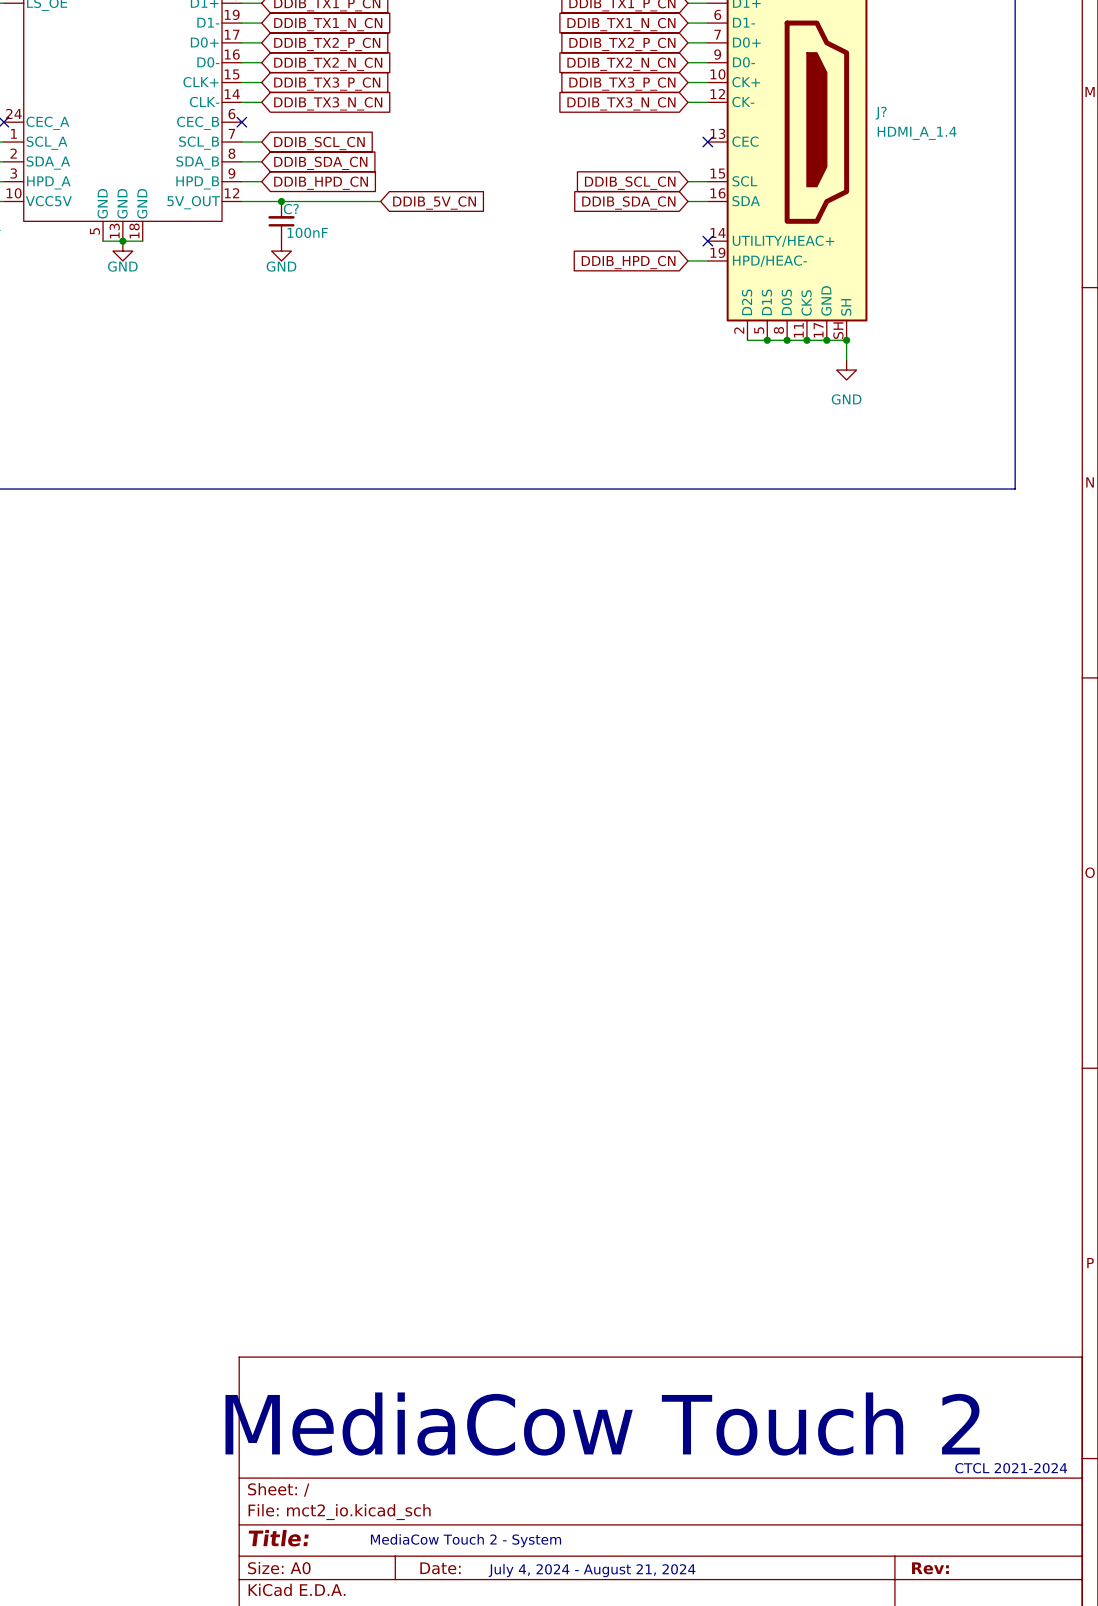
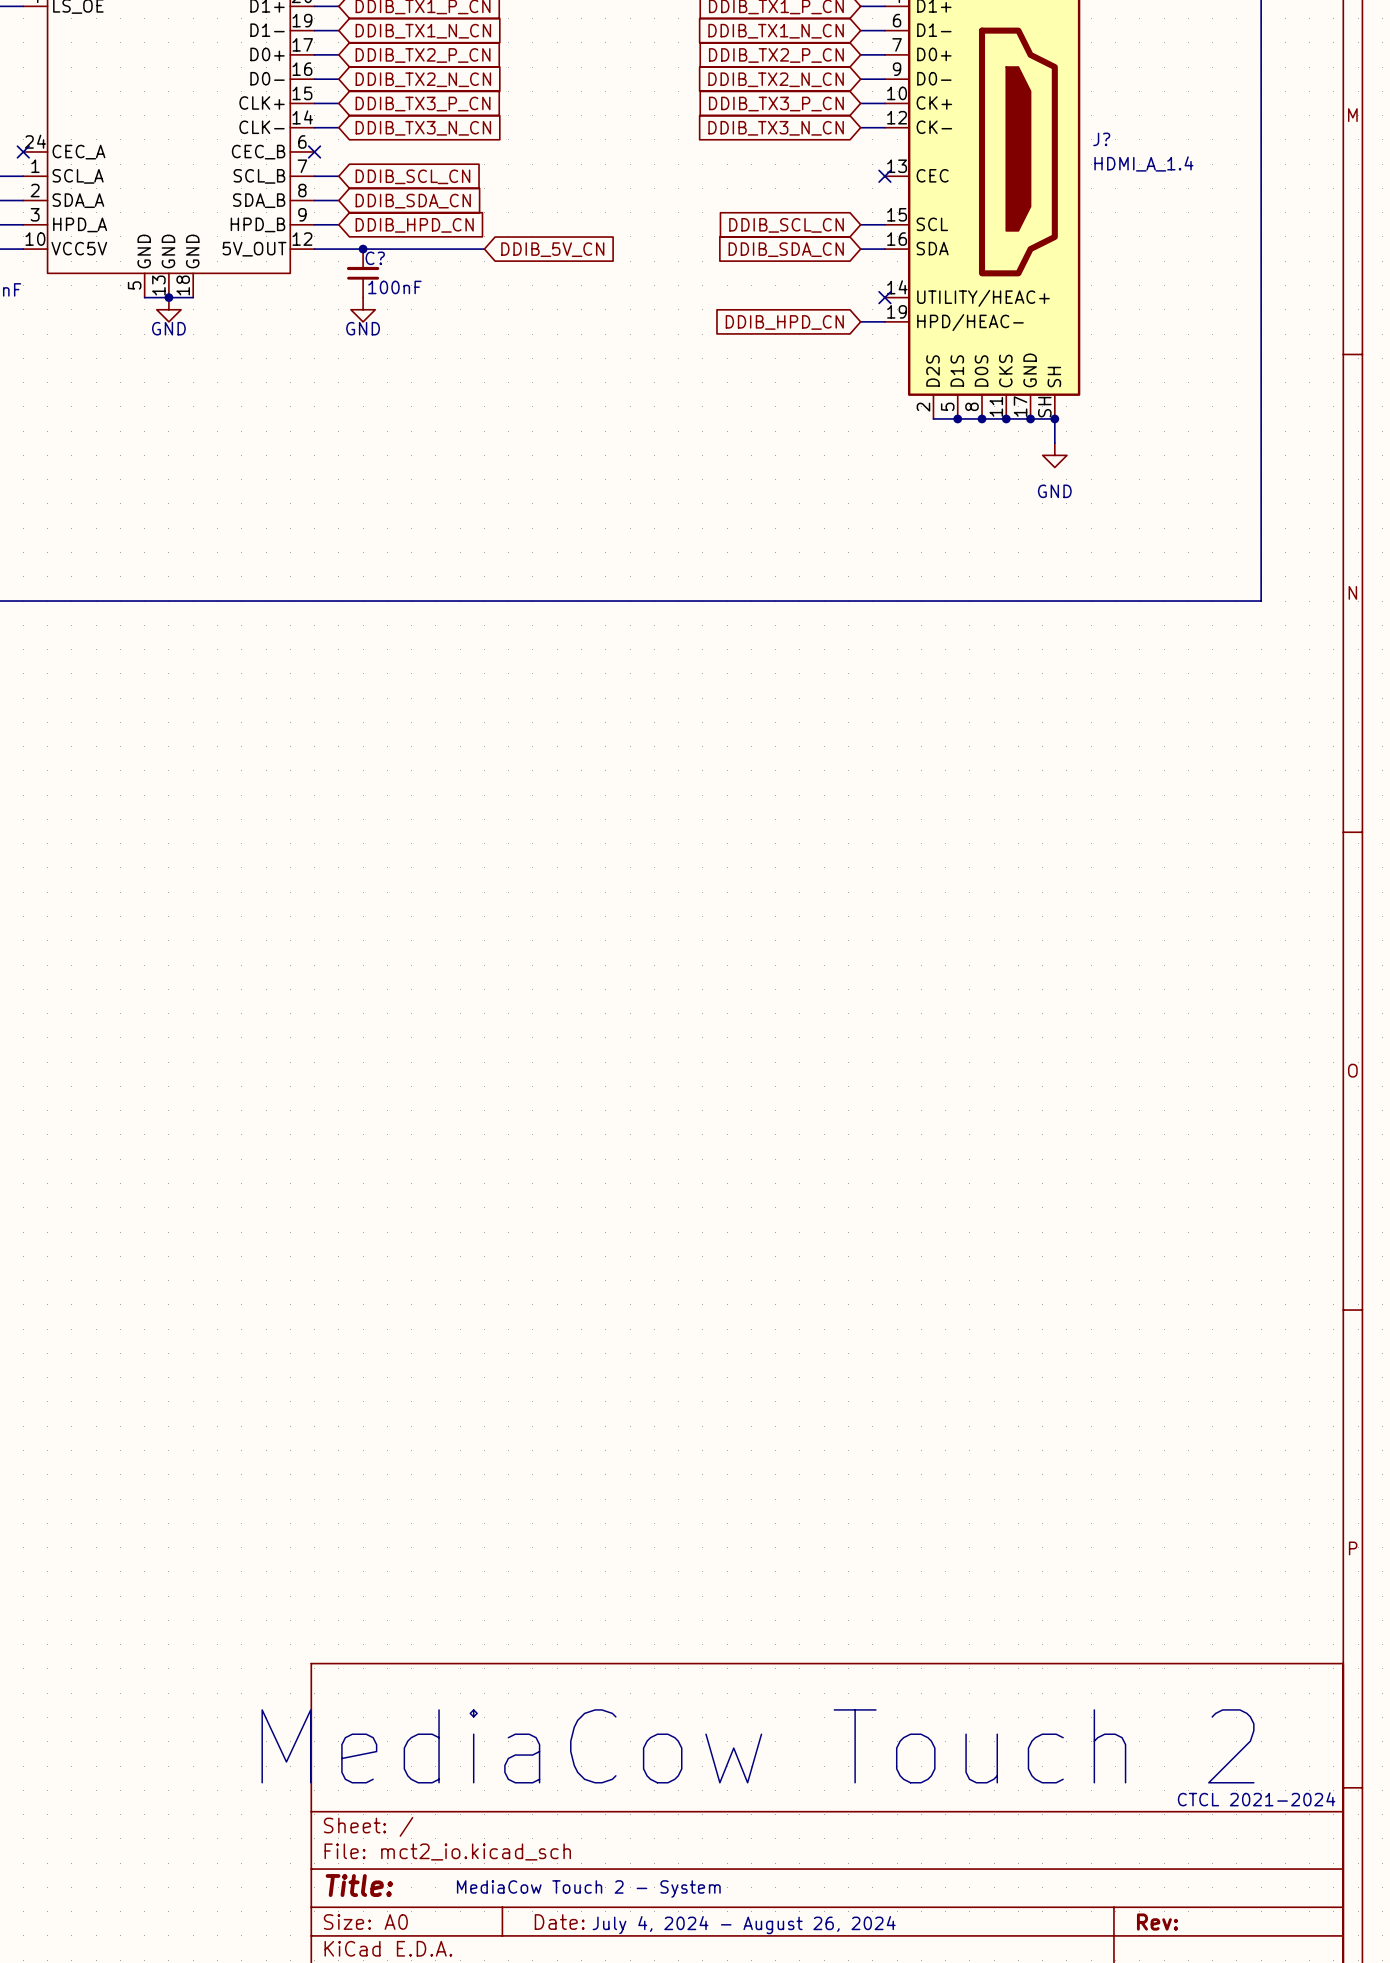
text: July 4, 2024 - August 21, 2024 (592, 1570) -> July 4, 2024 - August 26, 2024 (744, 1925)

